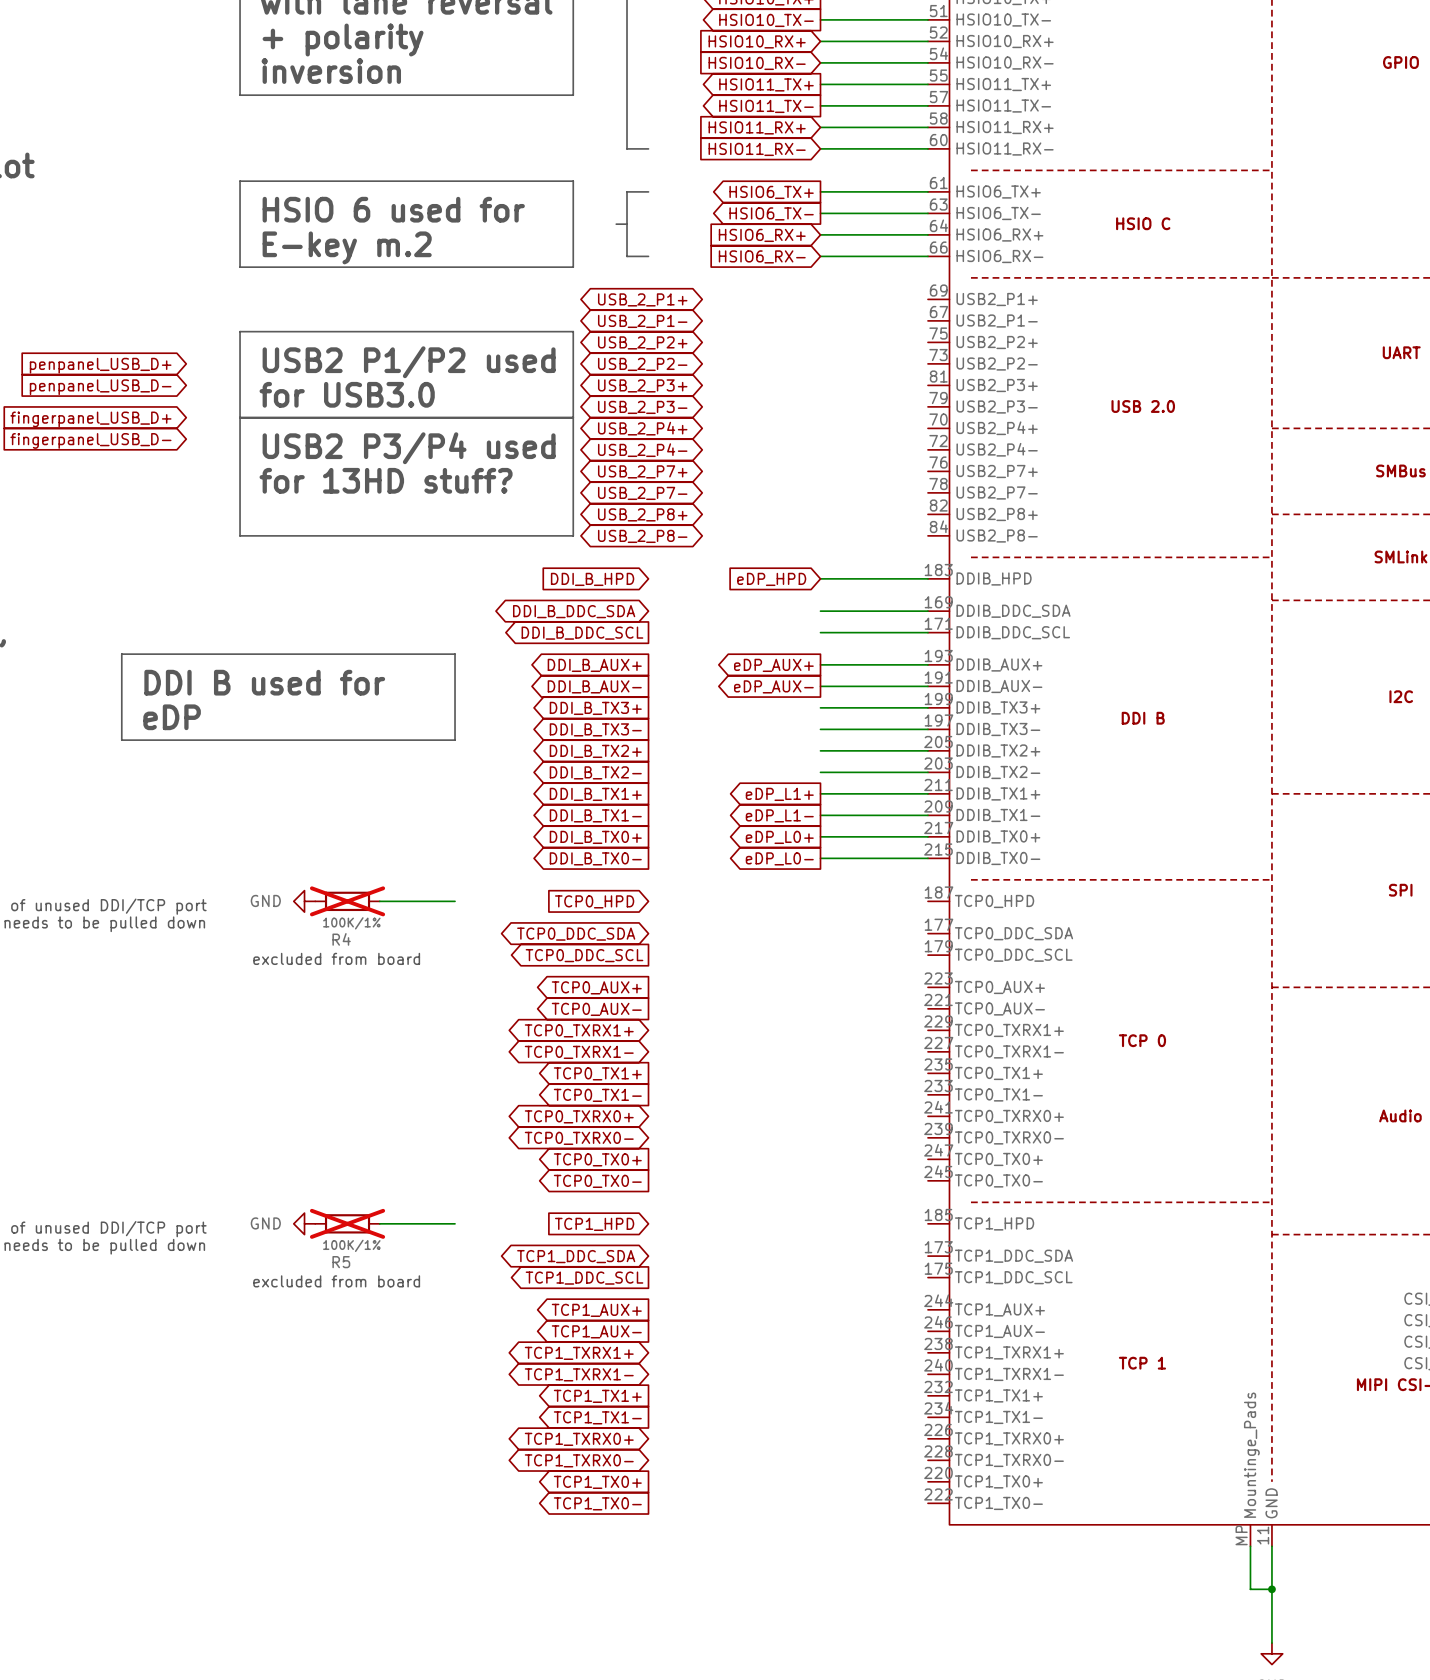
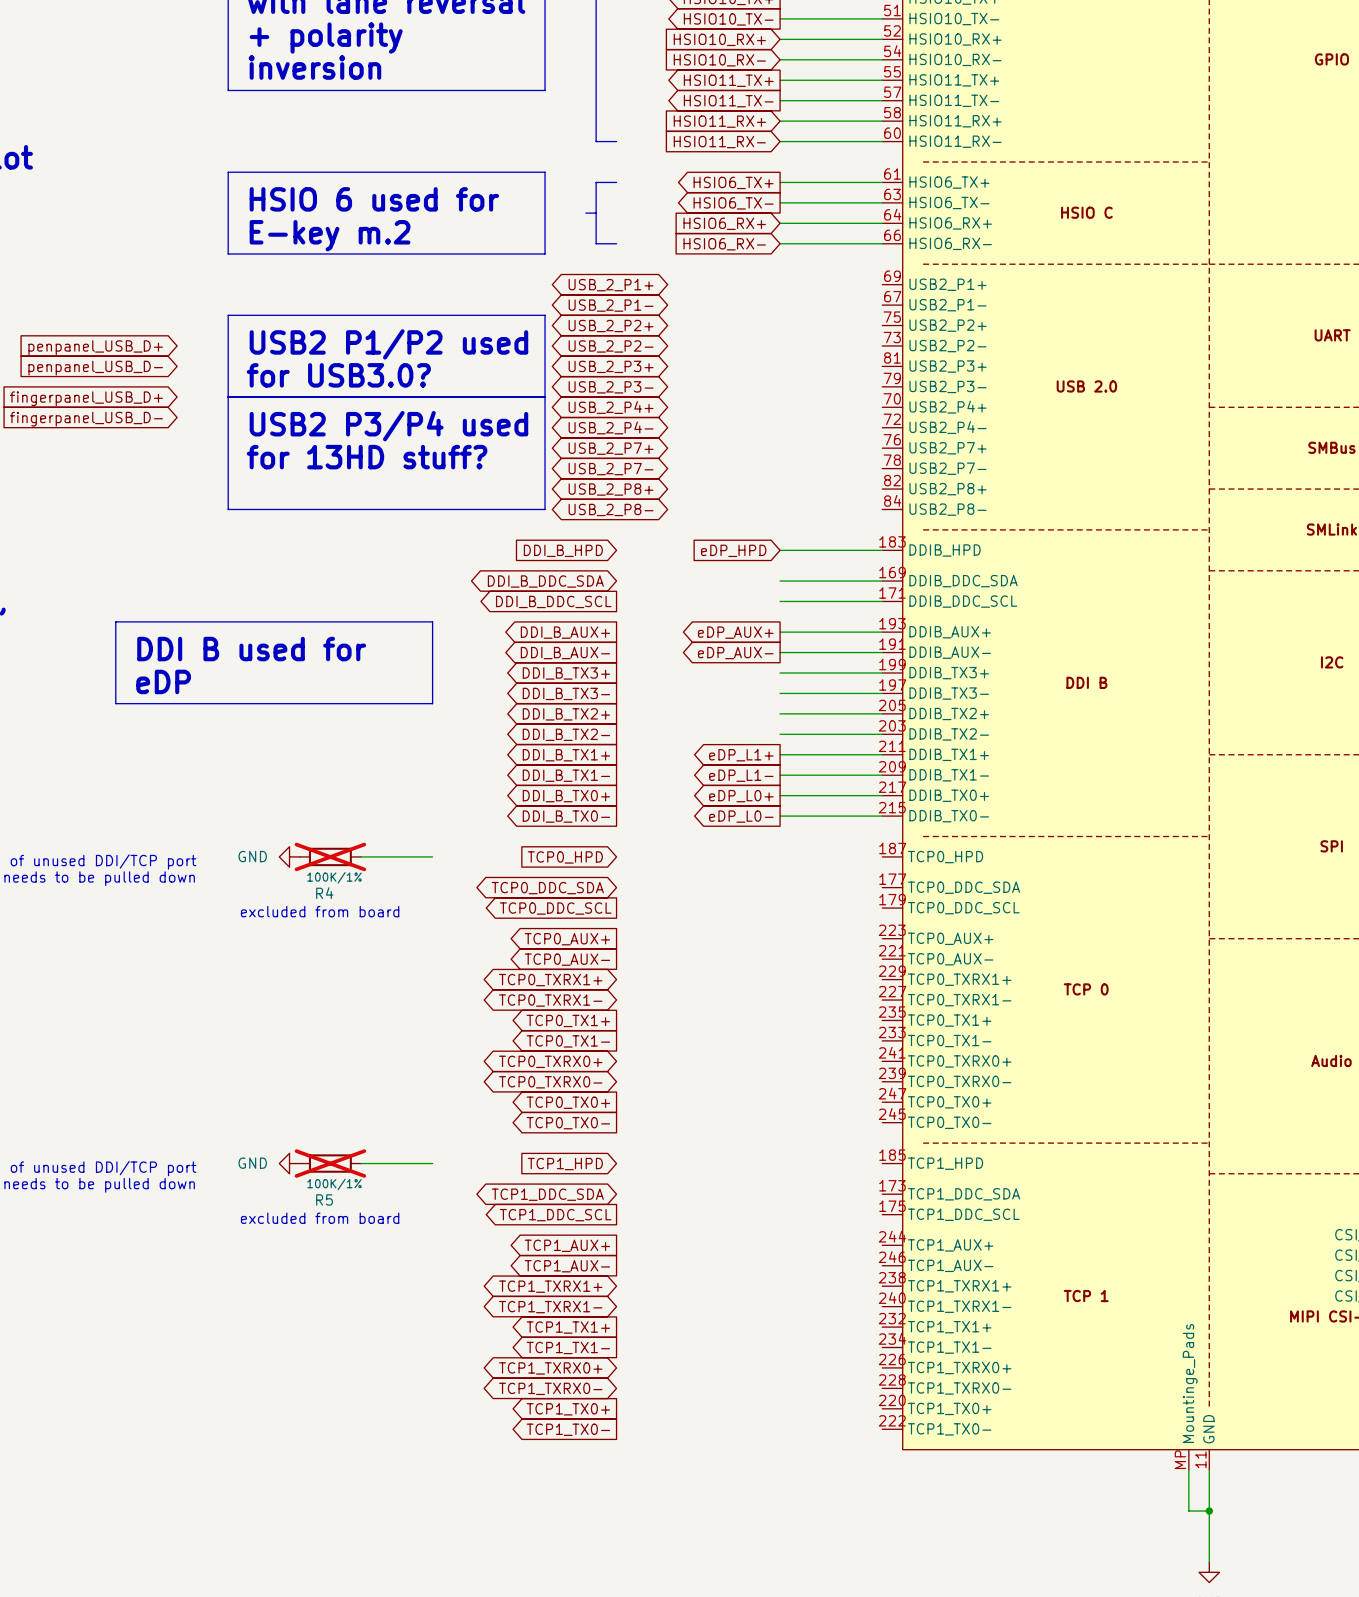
text: for USB3.0 (347, 394) -> for USB3.0? (338, 375)

